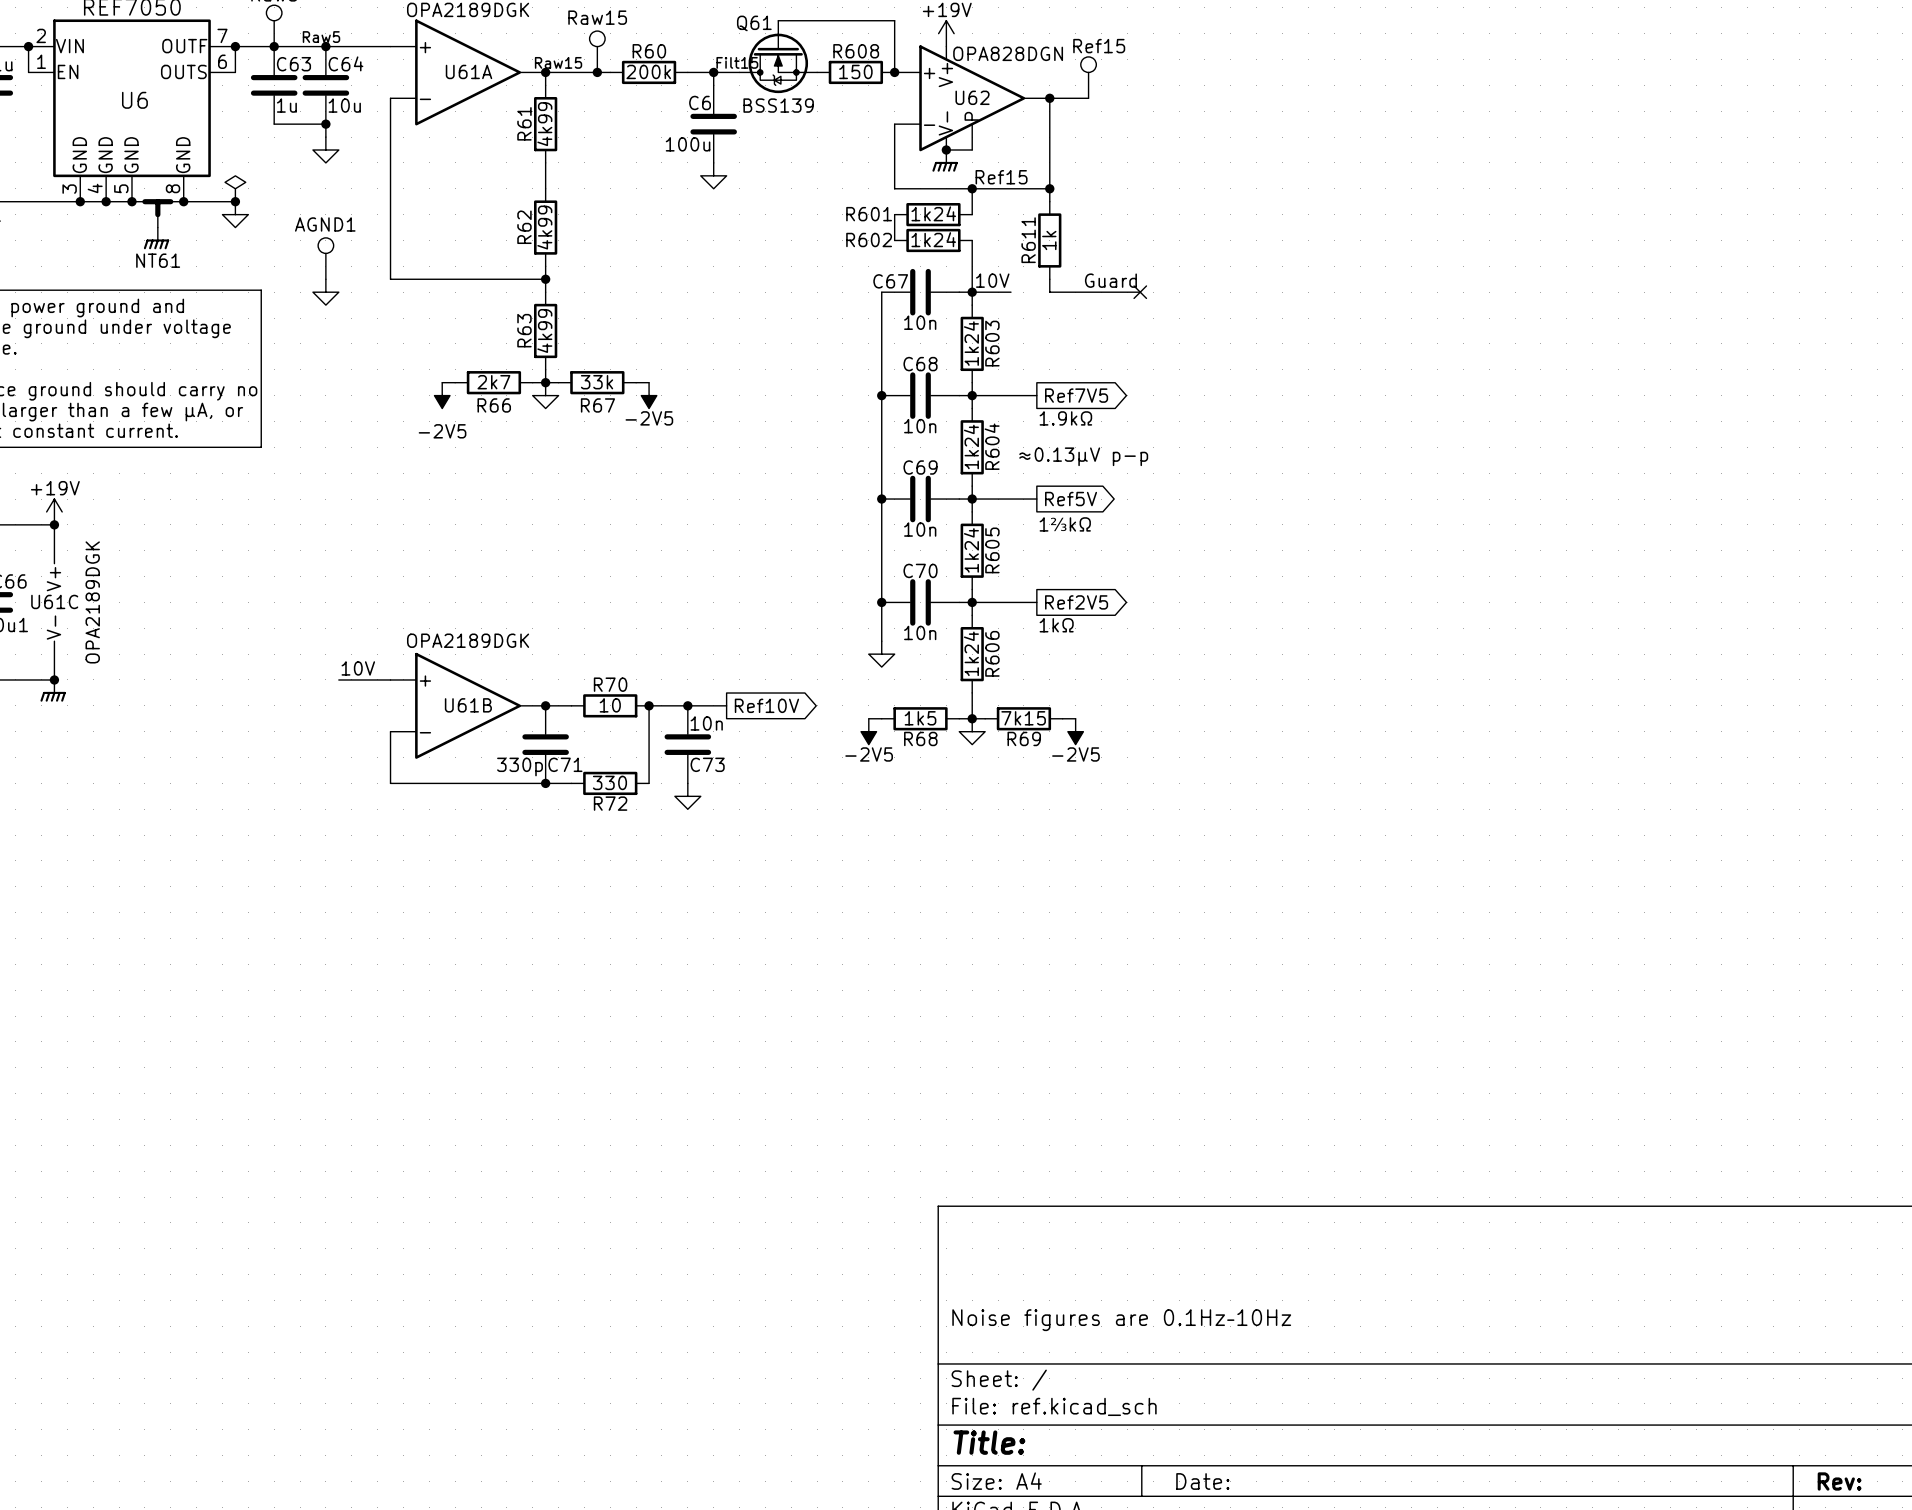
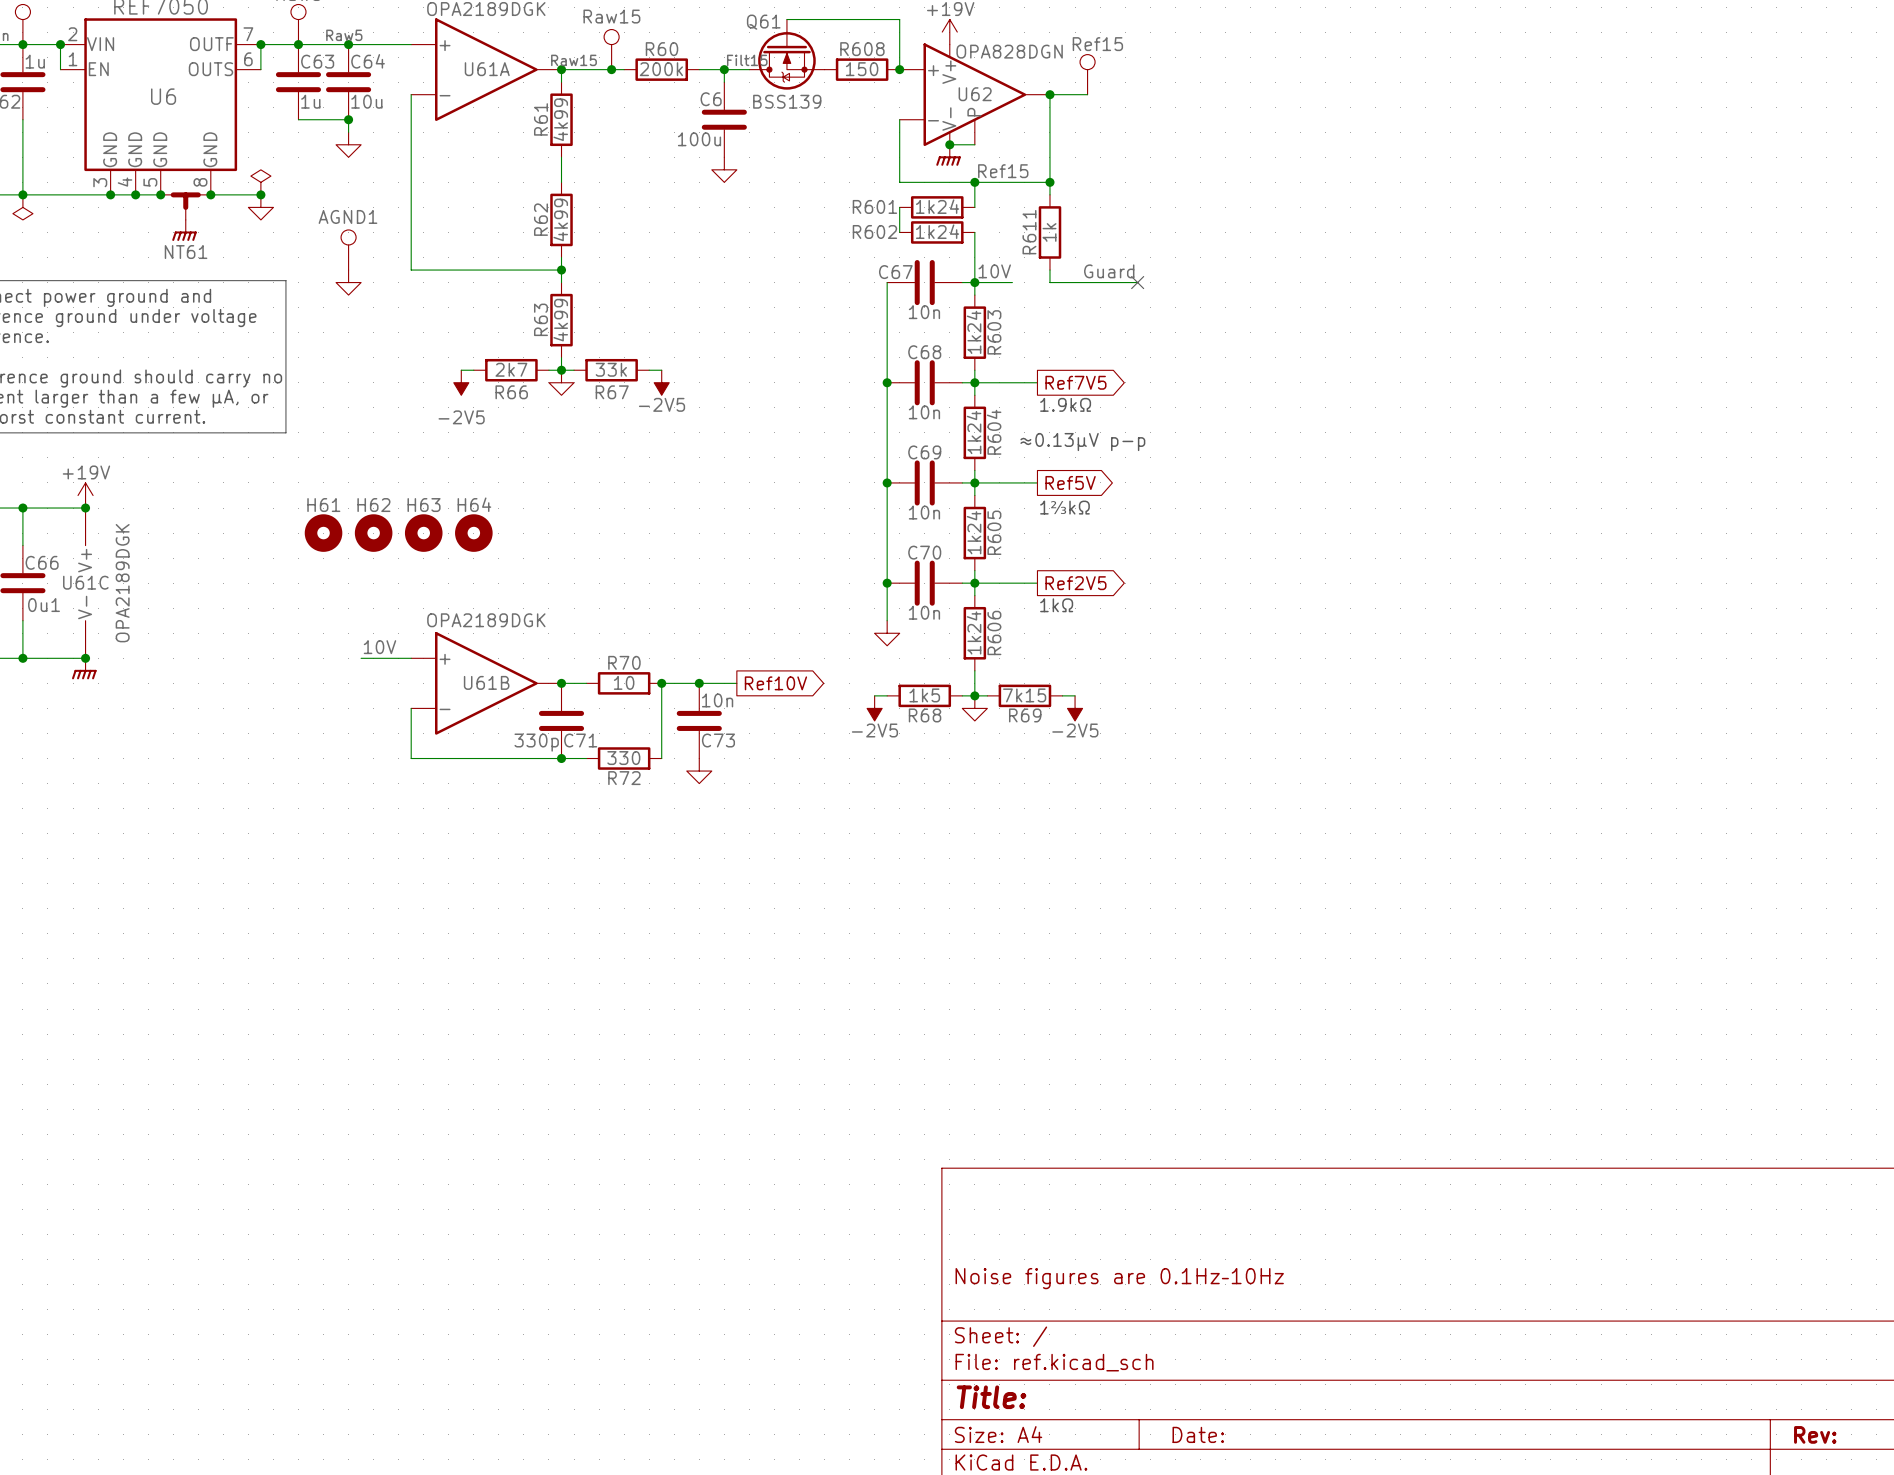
H61: none -> (323, 533)
H62: none -> (373, 533)
H63: none -> (423, 533)
H64: none -> (473, 533)

